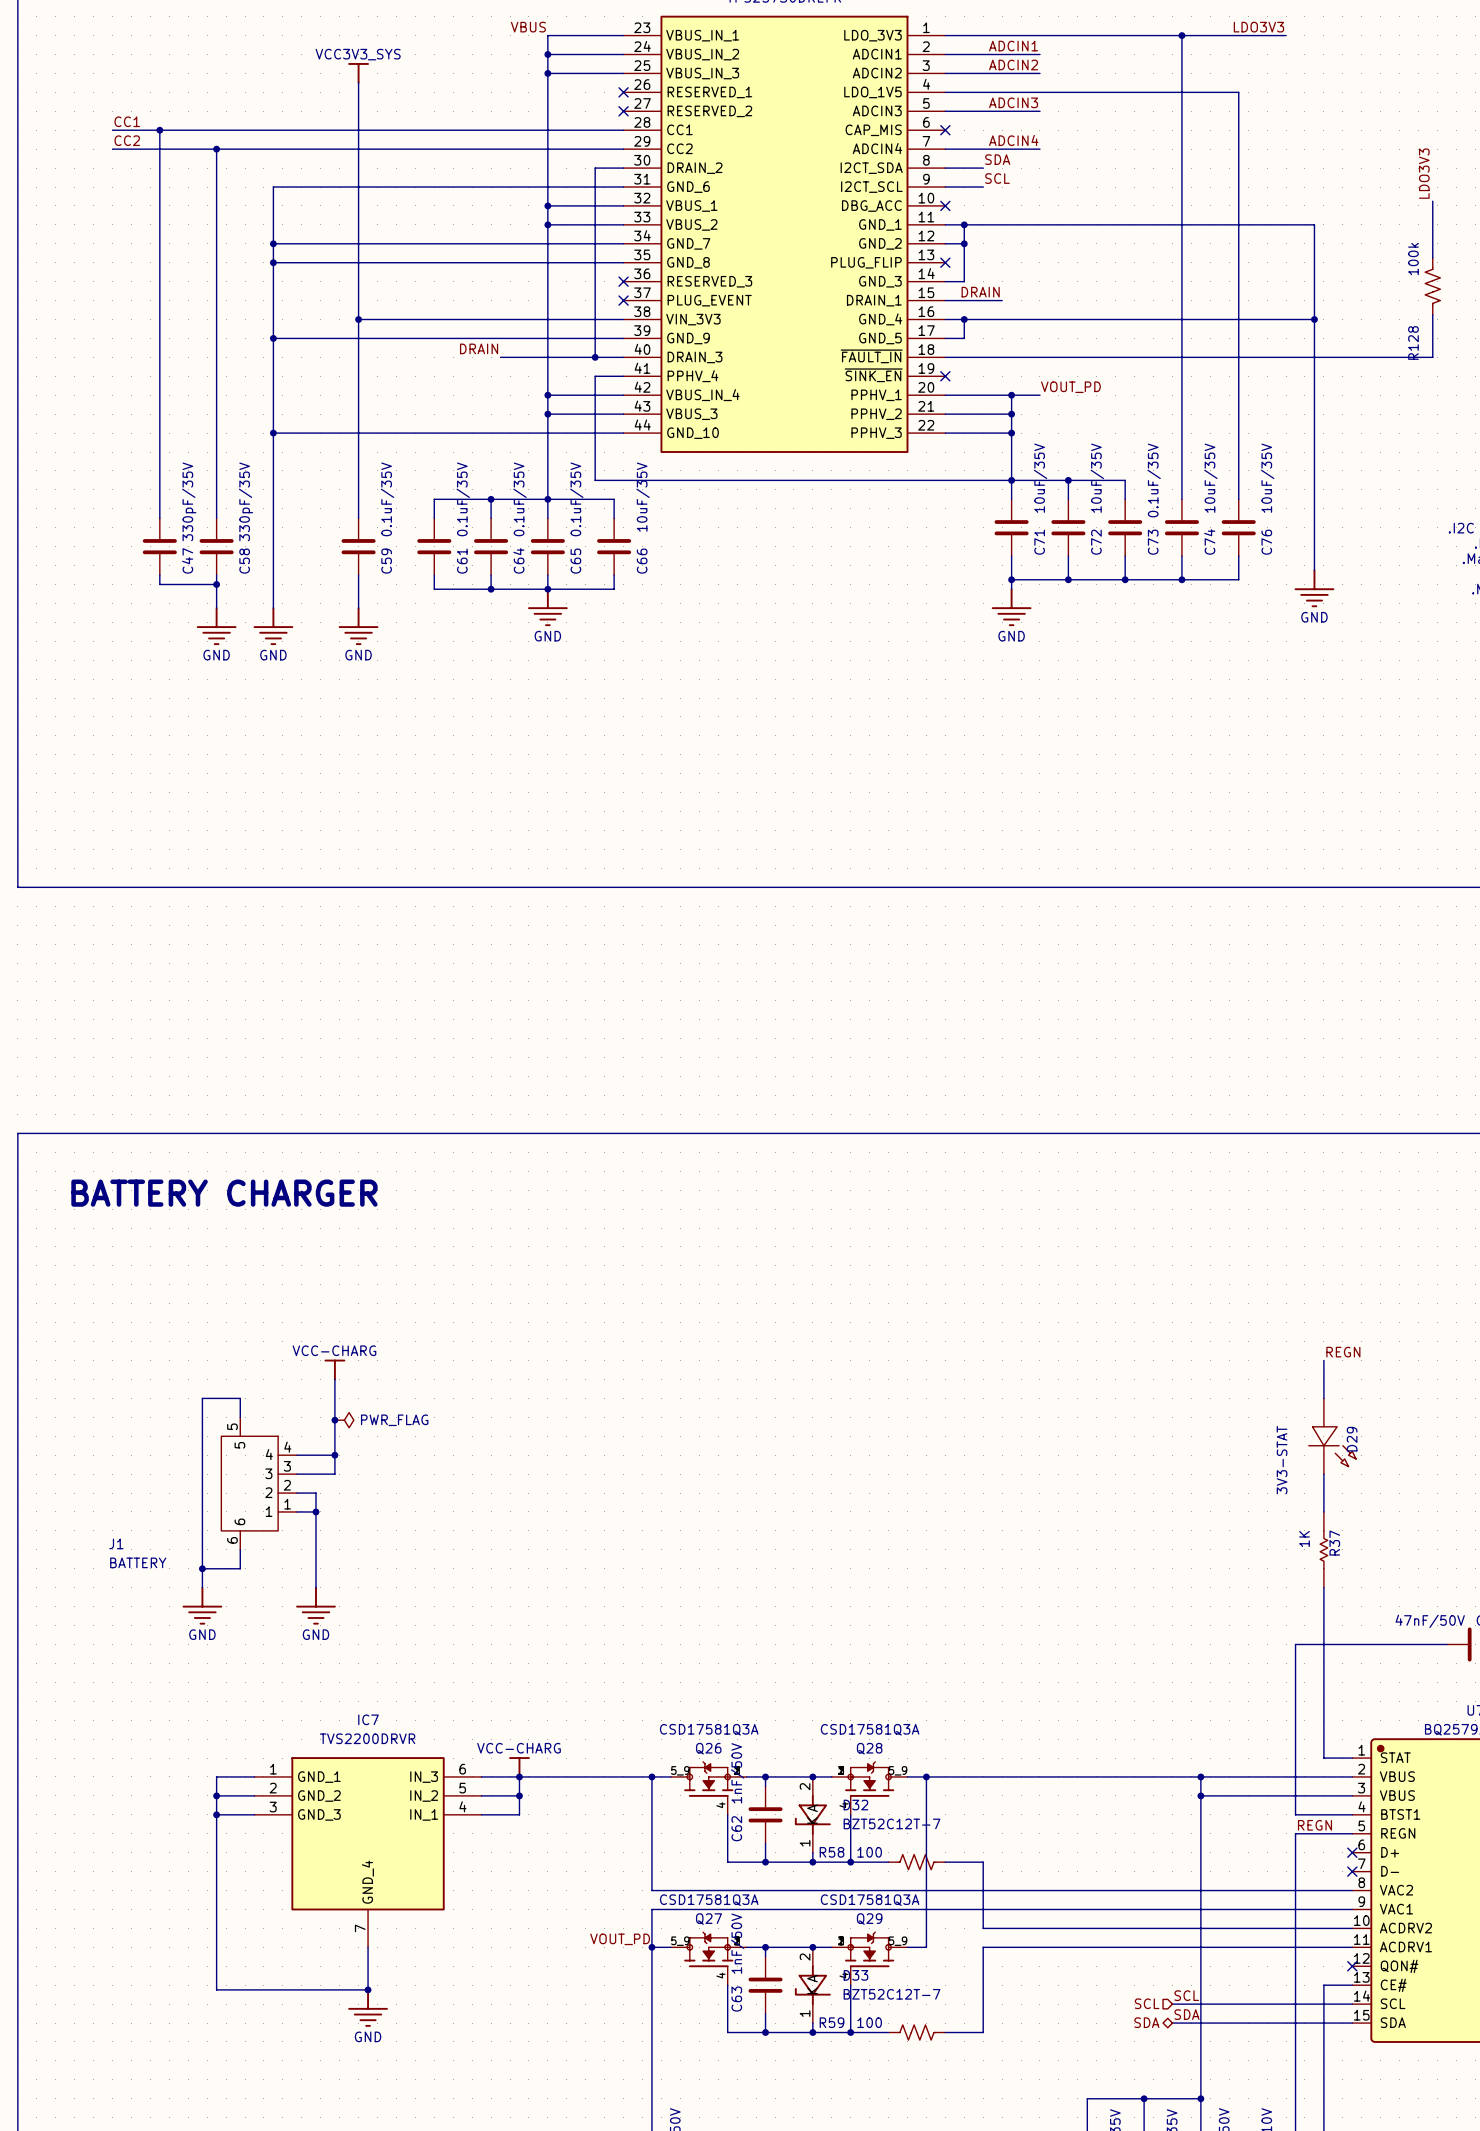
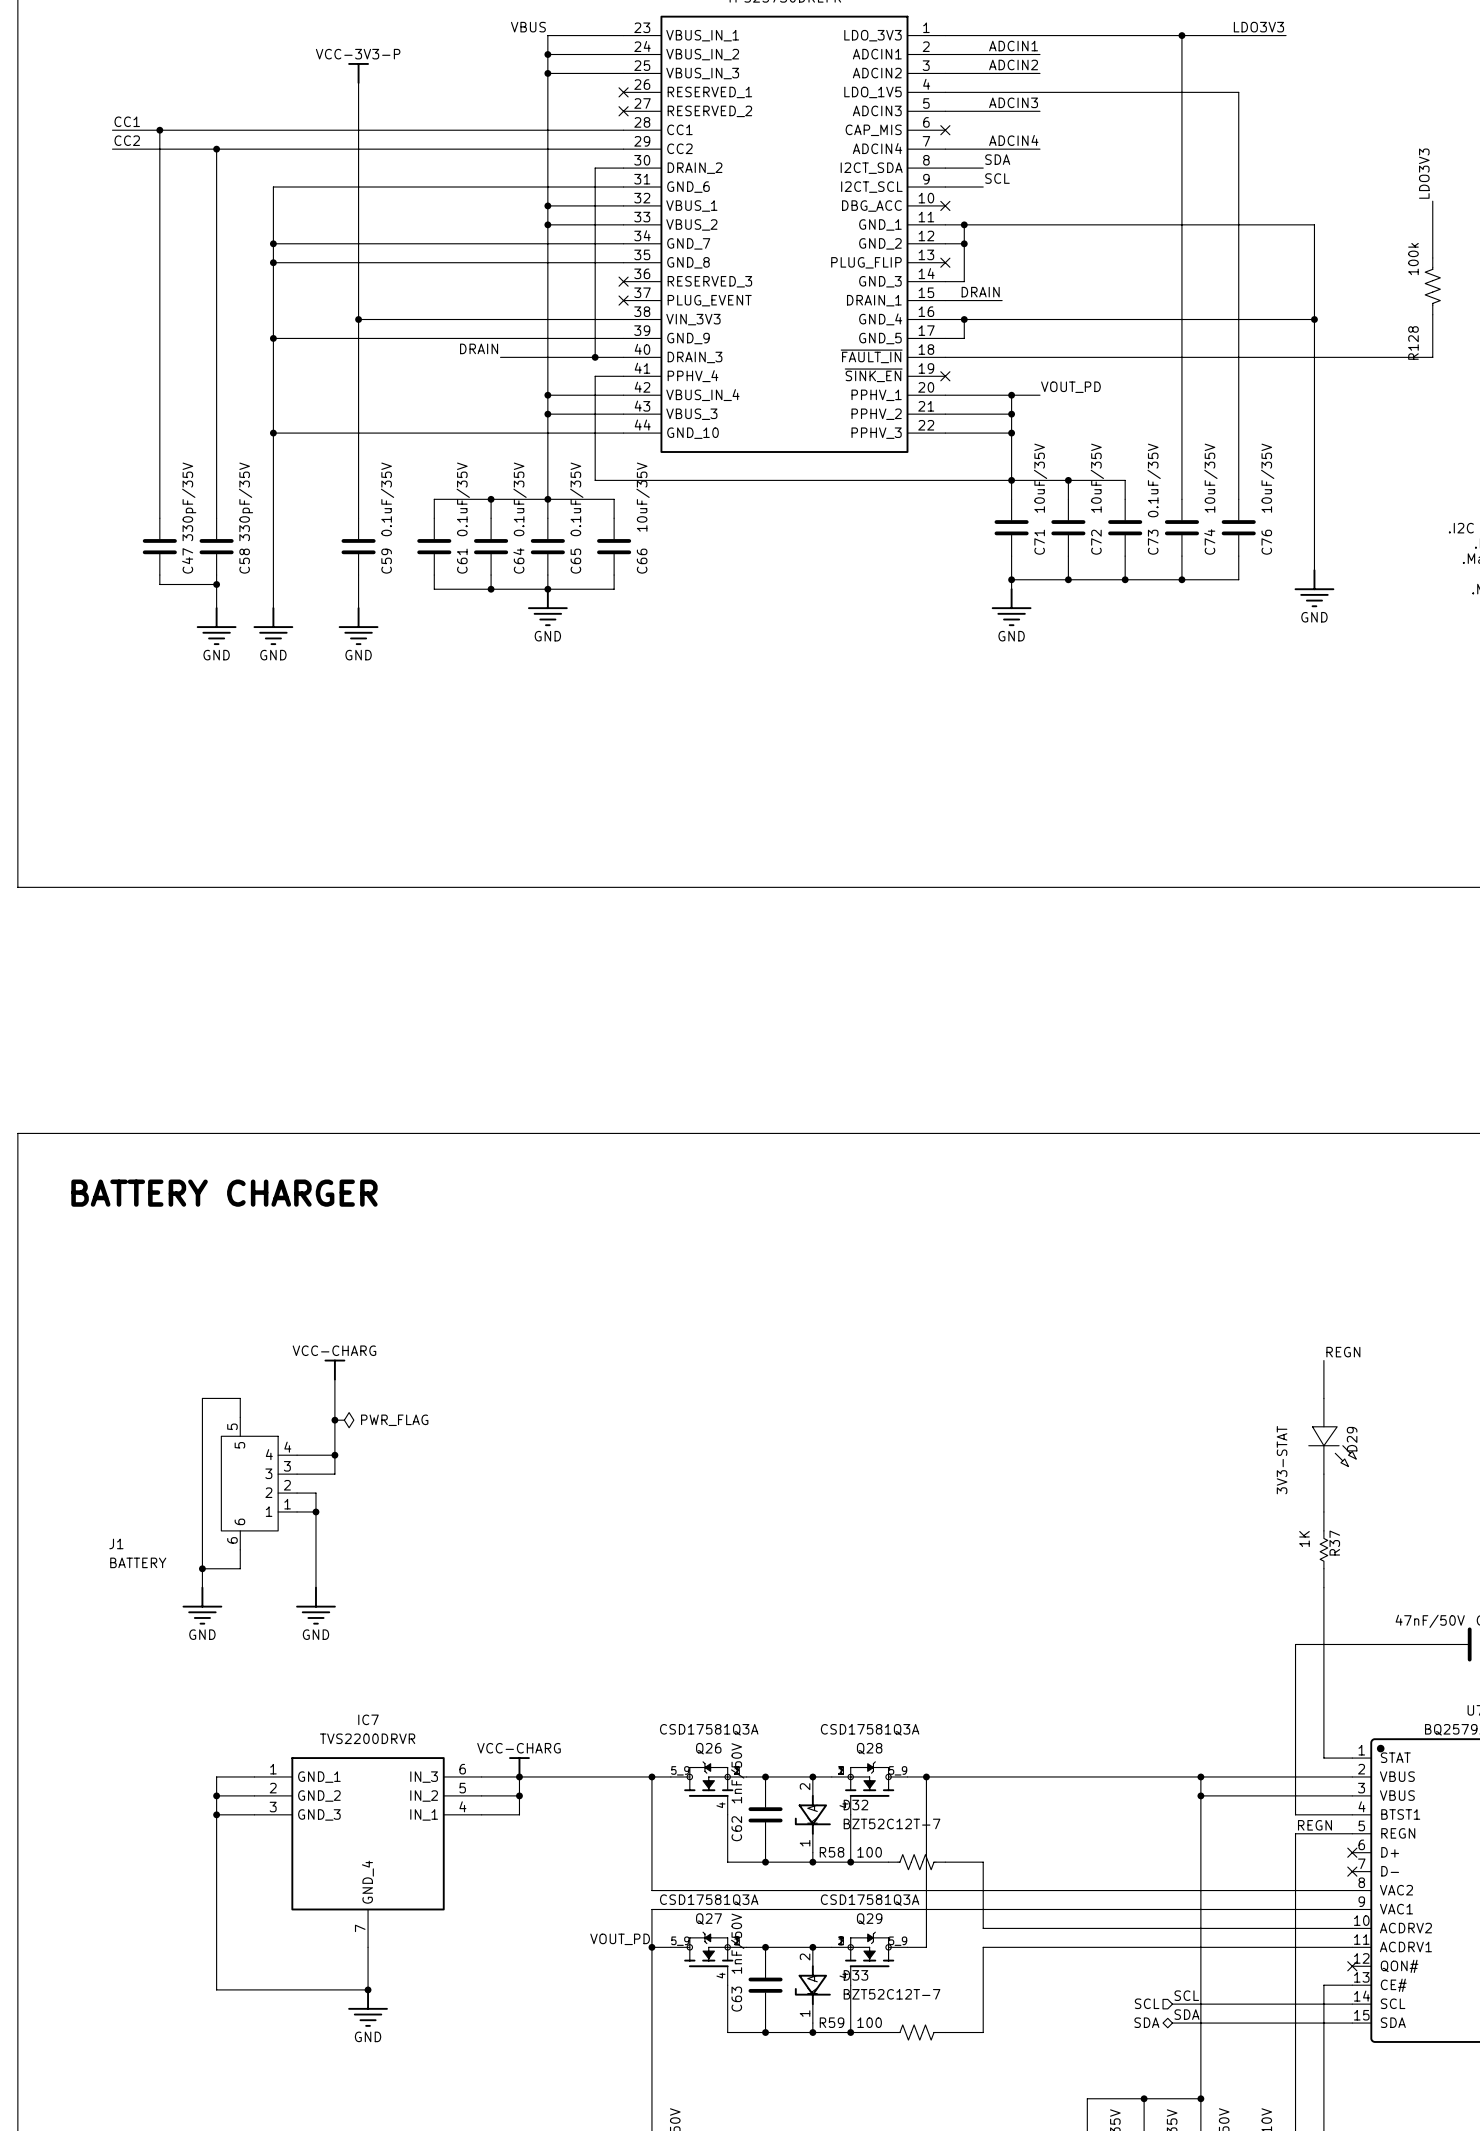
power symbol: VCC3V3_SYS (358, 73) -> VCC-3V3-P (358, 73)

